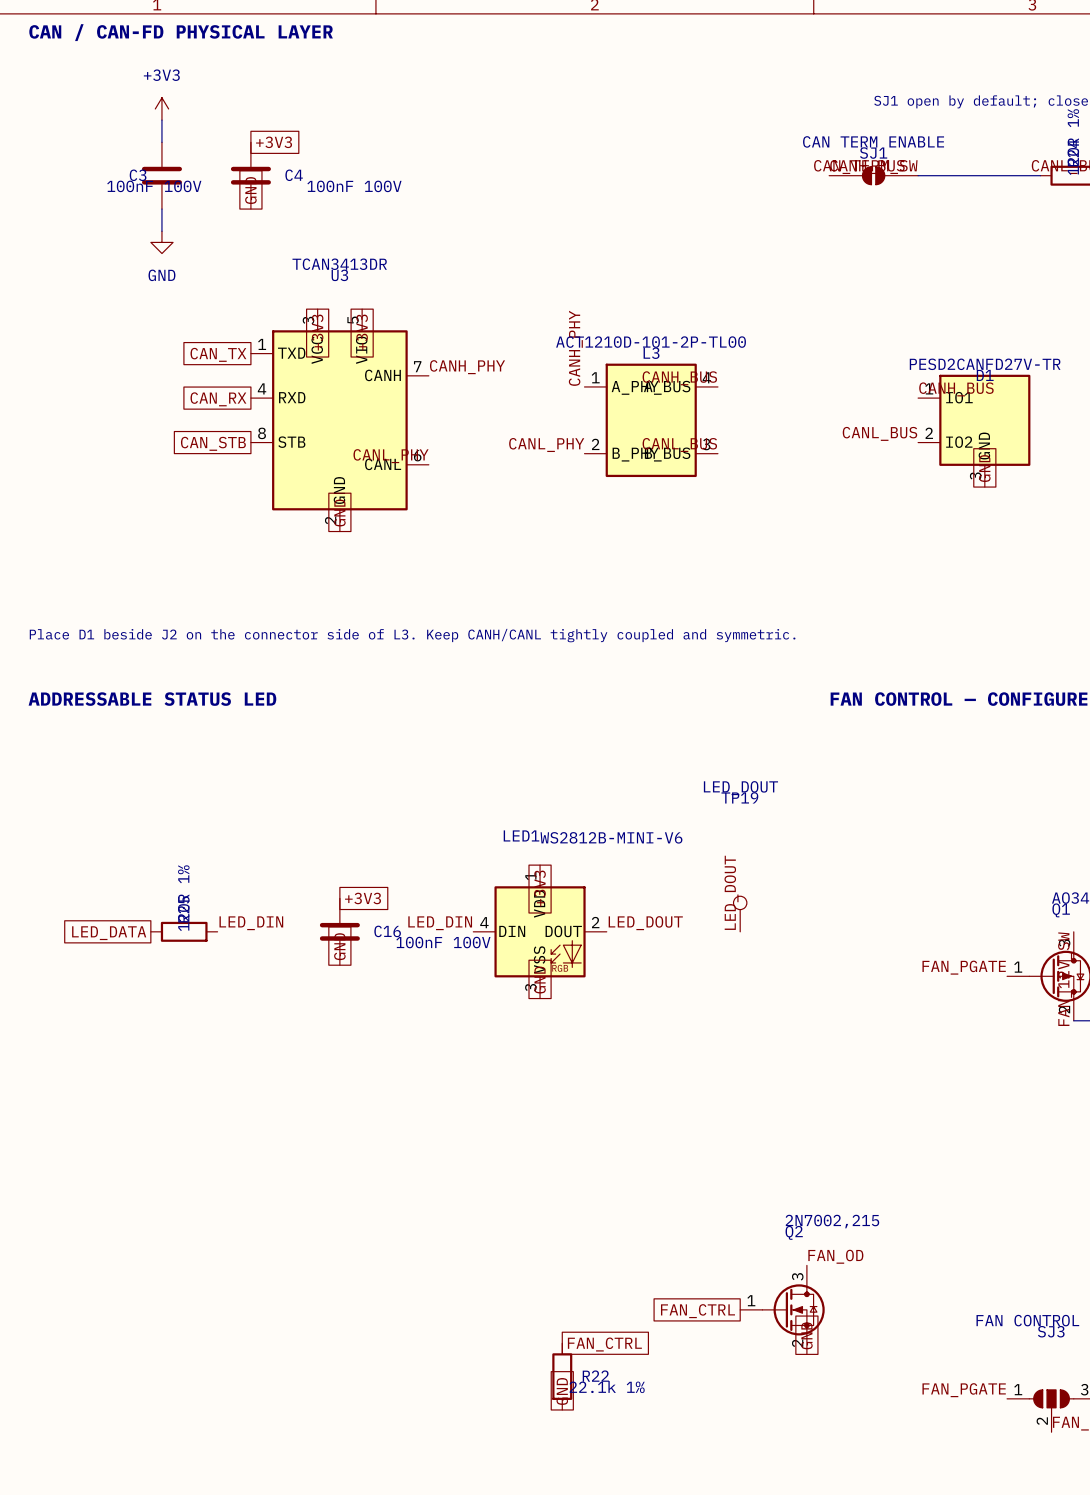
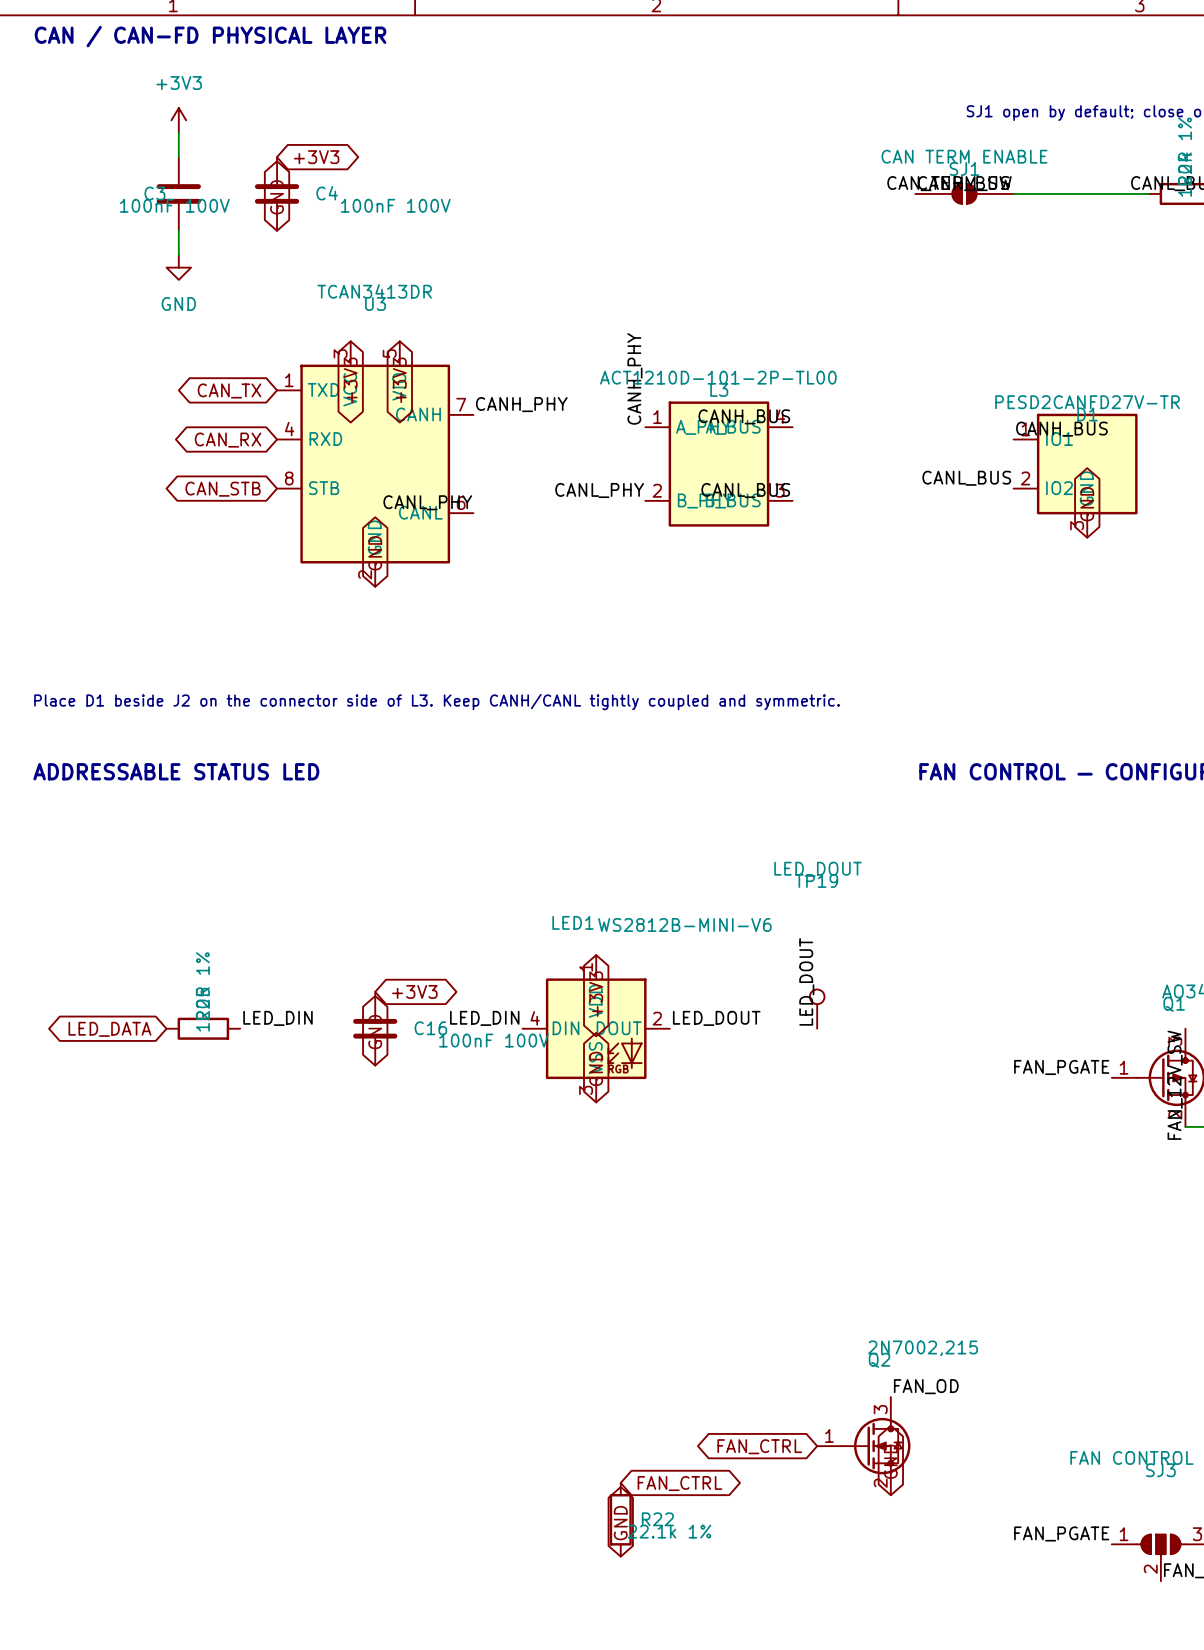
global label shape: passive (274, 142) -> bidirectional (316, 157)
global label shape: passive (250, 190) -> bidirectional (277, 197)
global label shape: passive (317, 332) -> bidirectional (350, 380)
global label shape: passive (362, 332) -> bidirectional (399, 380)
global label shape: passive (218, 354) -> bidirectional (229, 390)
global label shape: passive (218, 399) -> bidirectional (228, 440)
global label shape: passive (213, 443) -> bidirectional (223, 489)
global label shape: passive (984, 468) -> bidirectional (1087, 504)
global label shape: passive (339, 513) -> bidirectional (375, 553)
global label shape: passive (540, 888) -> bidirectional (596, 994)
global label shape: passive (363, 898) -> bidirectional (414, 991)
global label shape: passive (109, 933) -> bidirectional (109, 1029)
global label shape: passive (339, 946) -> bidirectional (375, 1032)
global label shape: passive (540, 980) -> bidirectional (596, 1068)
global label shape: passive (697, 1311) -> bidirectional (759, 1446)
global label shape: passive (806, 1335) -> bidirectional (890, 1461)
global label shape: passive (604, 1344) -> bidirectional (679, 1483)
global label shape: passive (562, 1391) -> bidirectional (620, 1523)

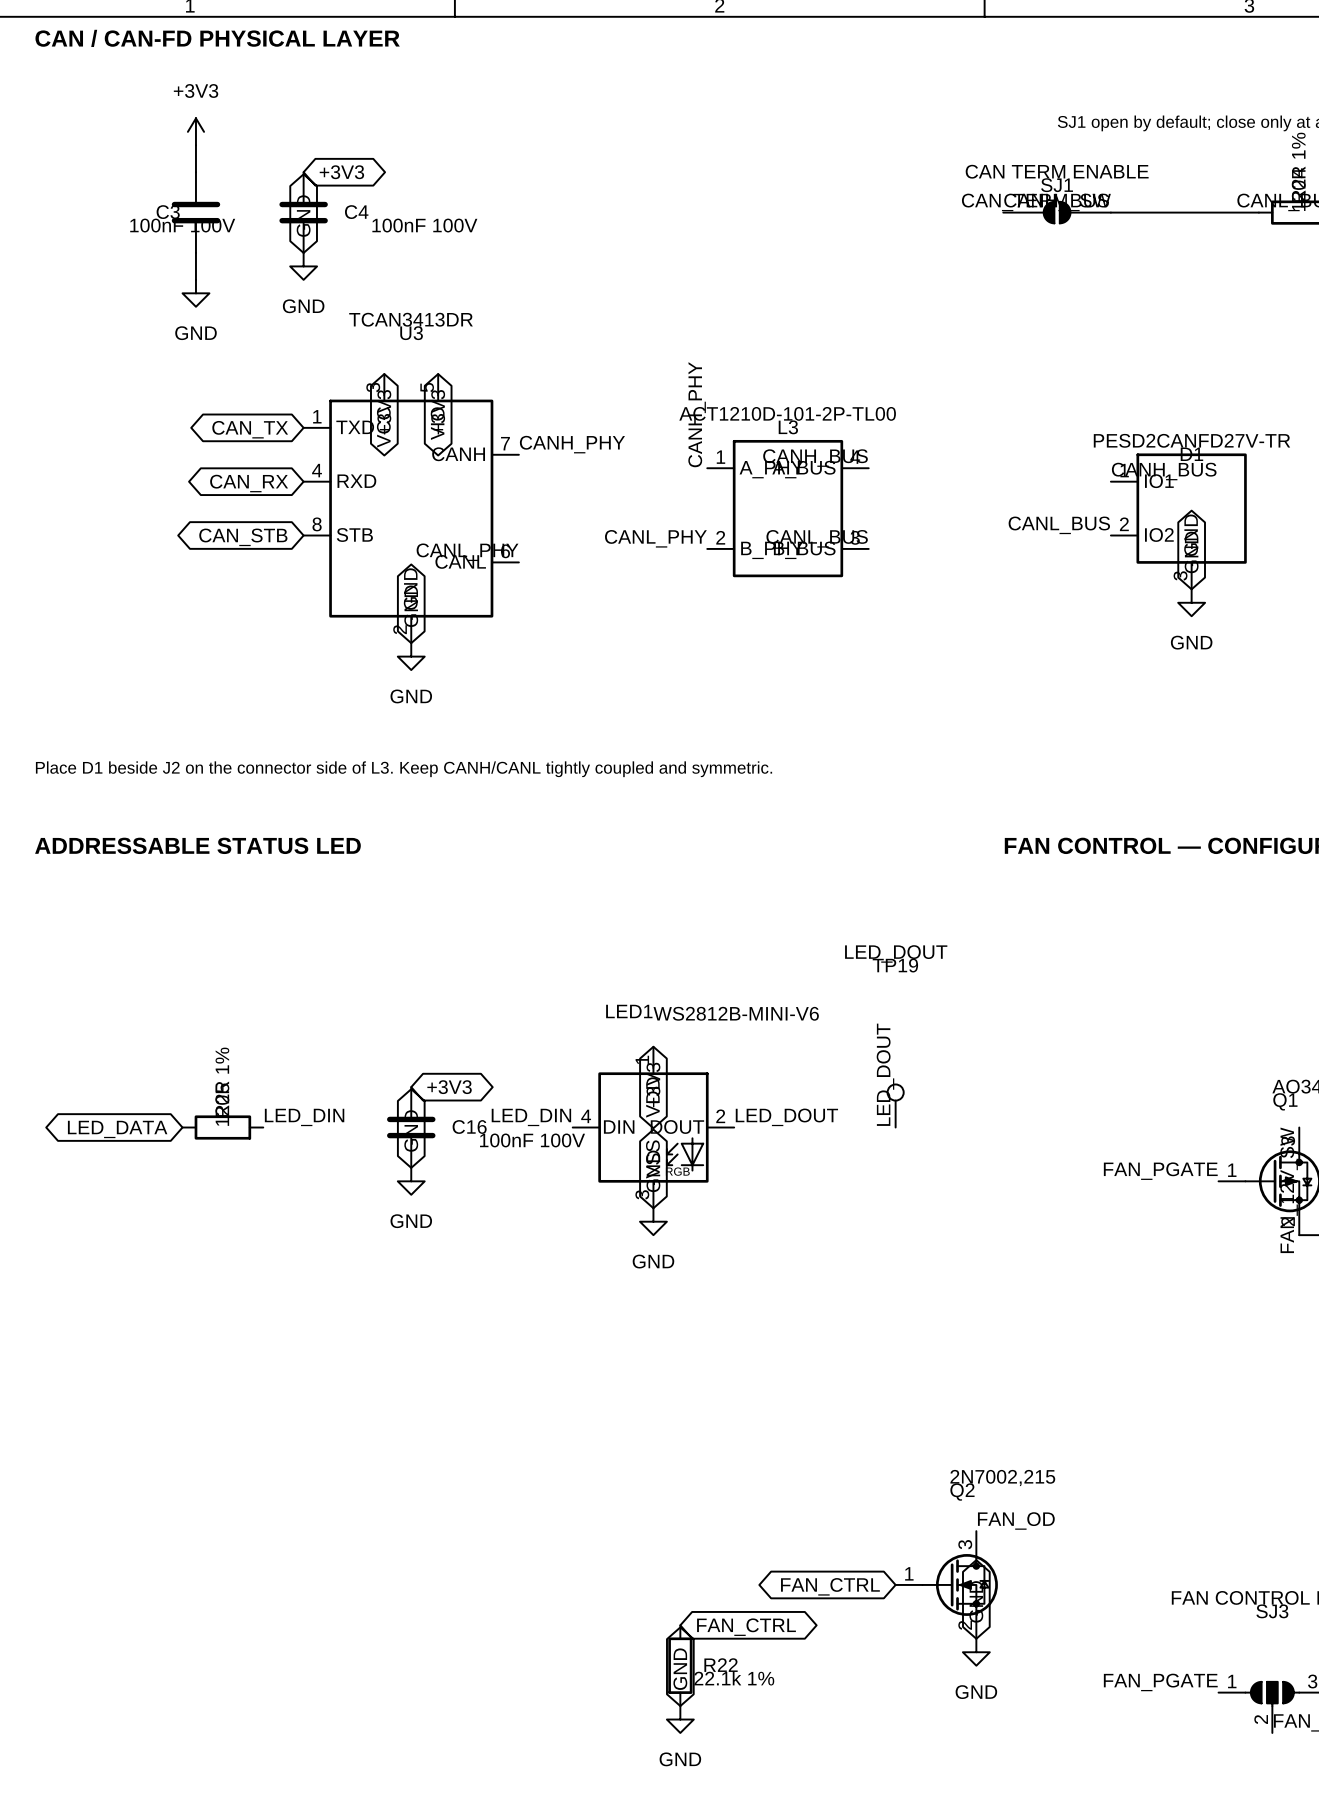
power symbol: none -> GND (303, 266)
power symbol: none -> GND (1191, 602)
power symbol: none -> GND (411, 656)
power symbol: none -> GND (411, 1181)
power symbol: none -> GND (653, 1221)
power symbol: none -> GND (976, 1652)
power symbol: none -> GND (680, 1719)

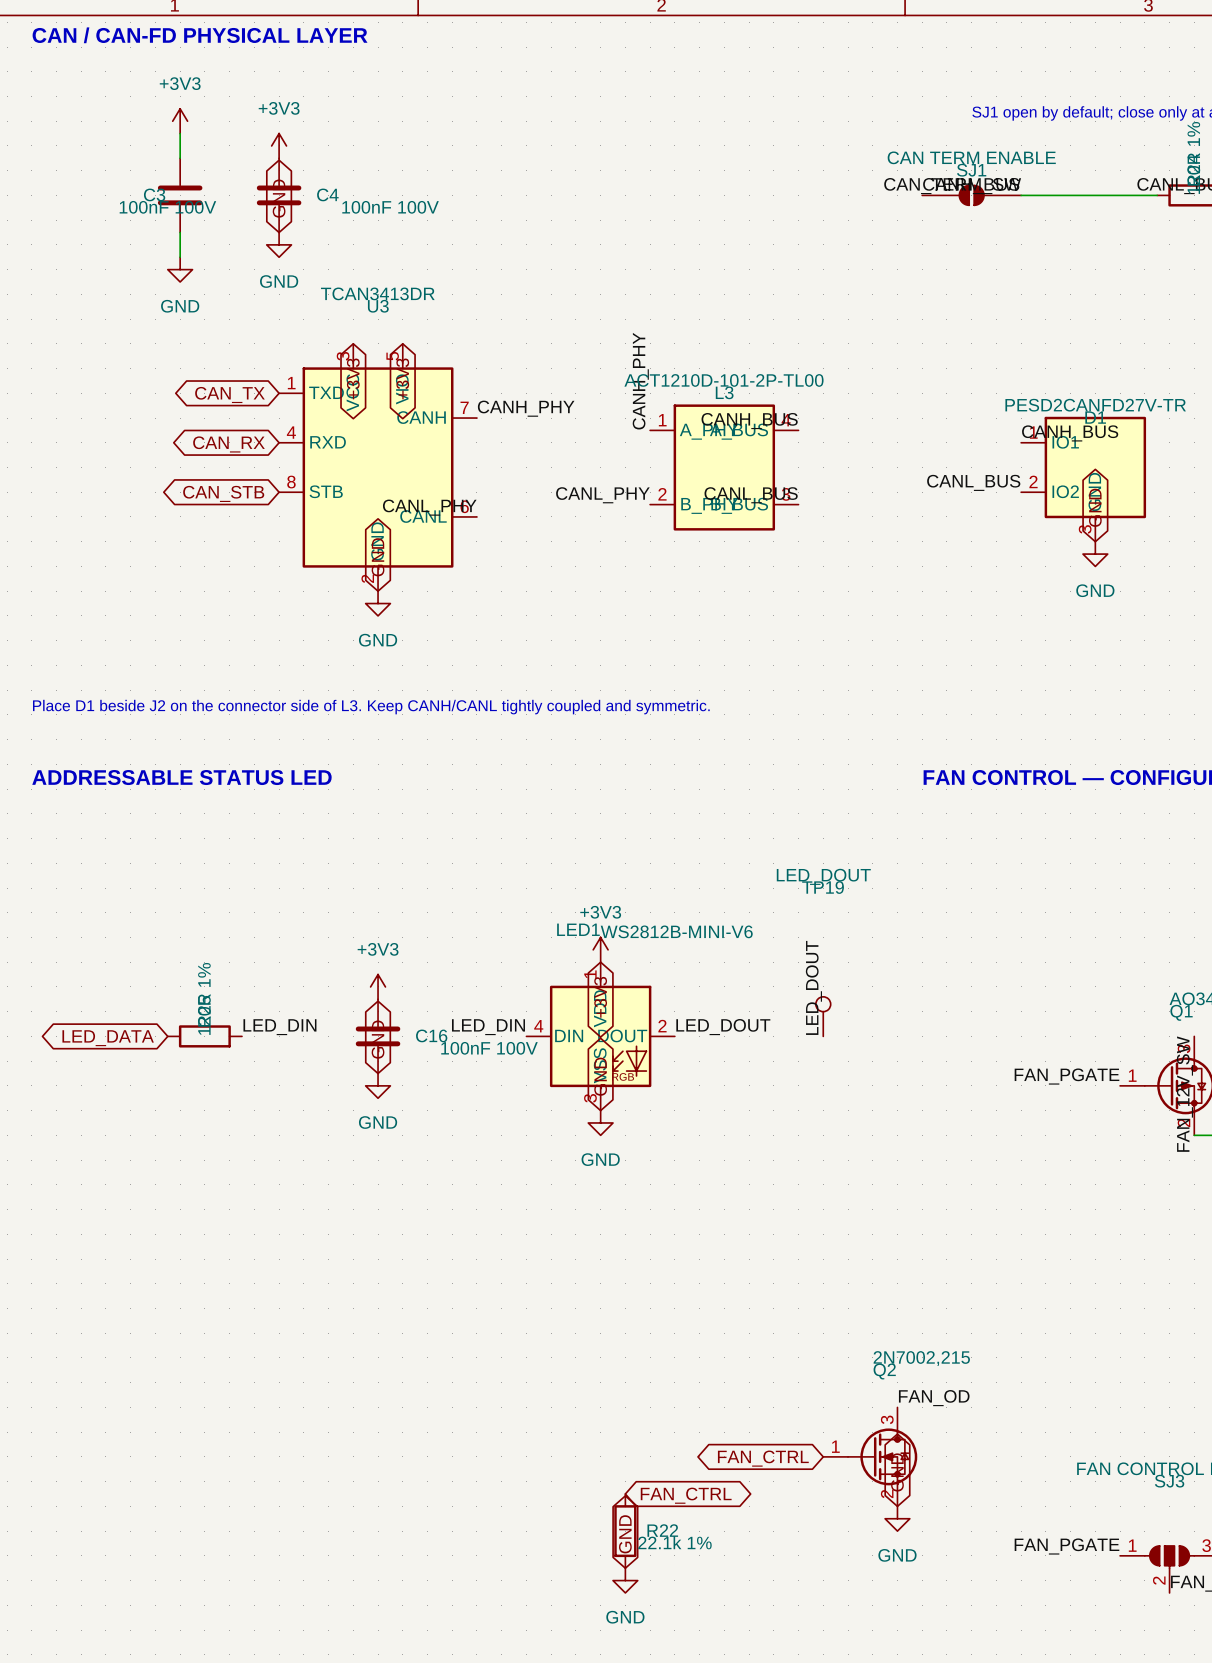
power symbol: none -> +3V3 (279, 145)
global label: +3V3 (341, 172) -> none
power symbol: none -> +3V3 (600, 949)
power symbol: none -> +3V3 (378, 986)
global label: +3V3 (449, 1087) -> none

